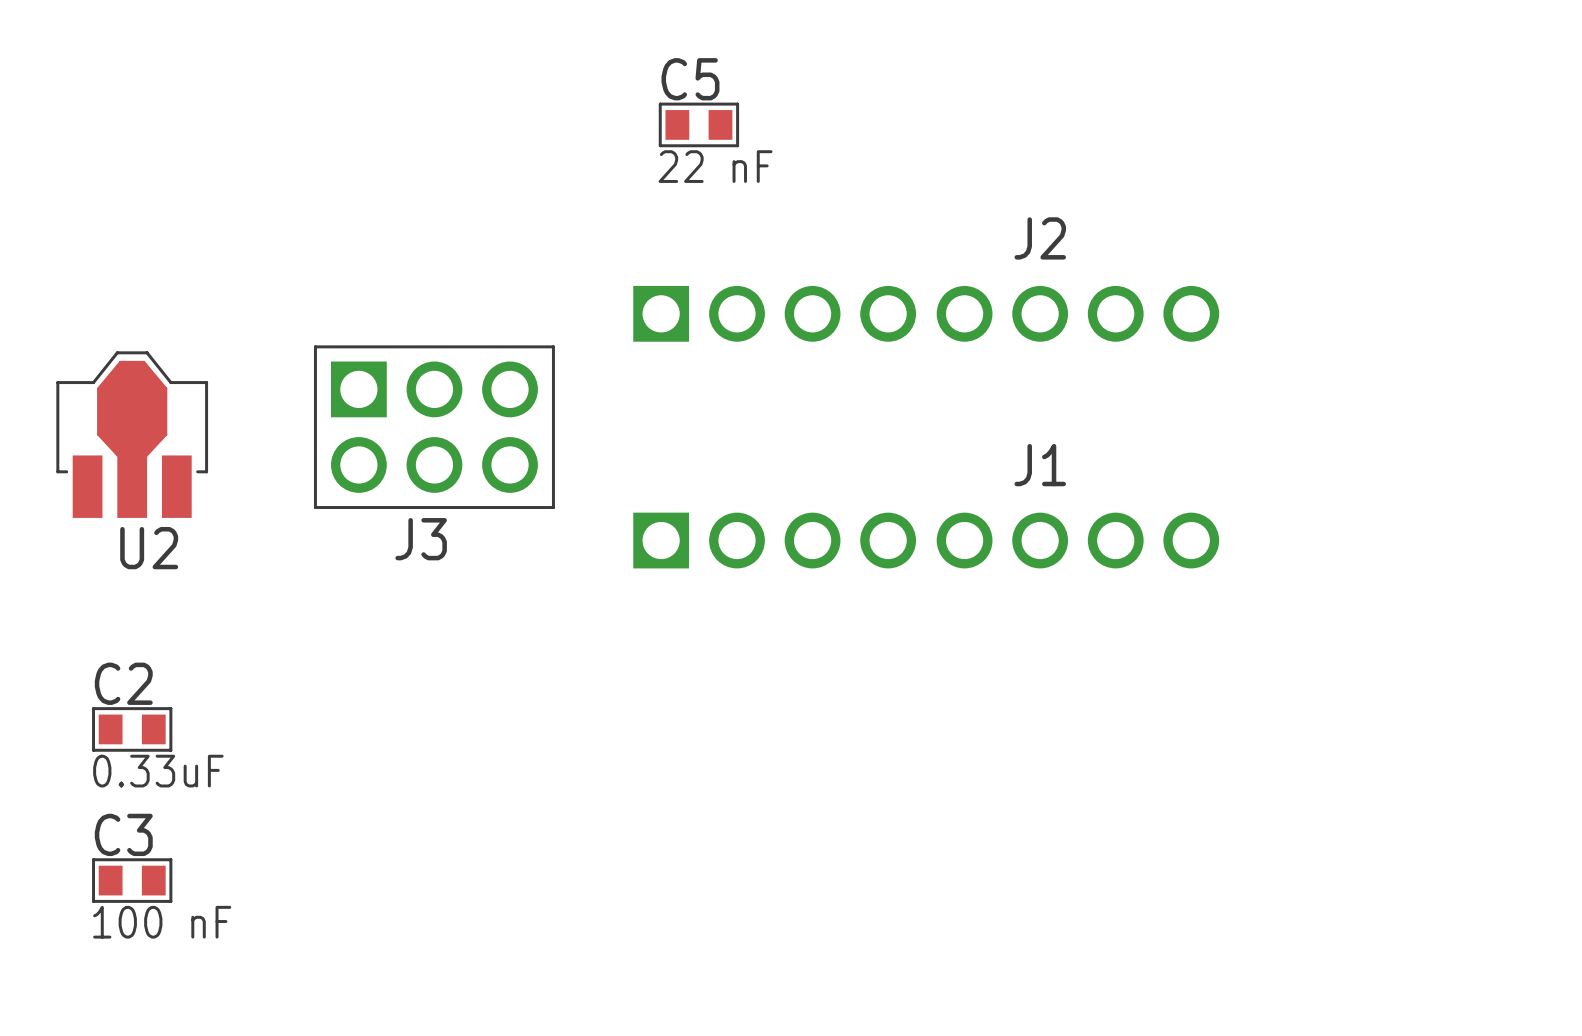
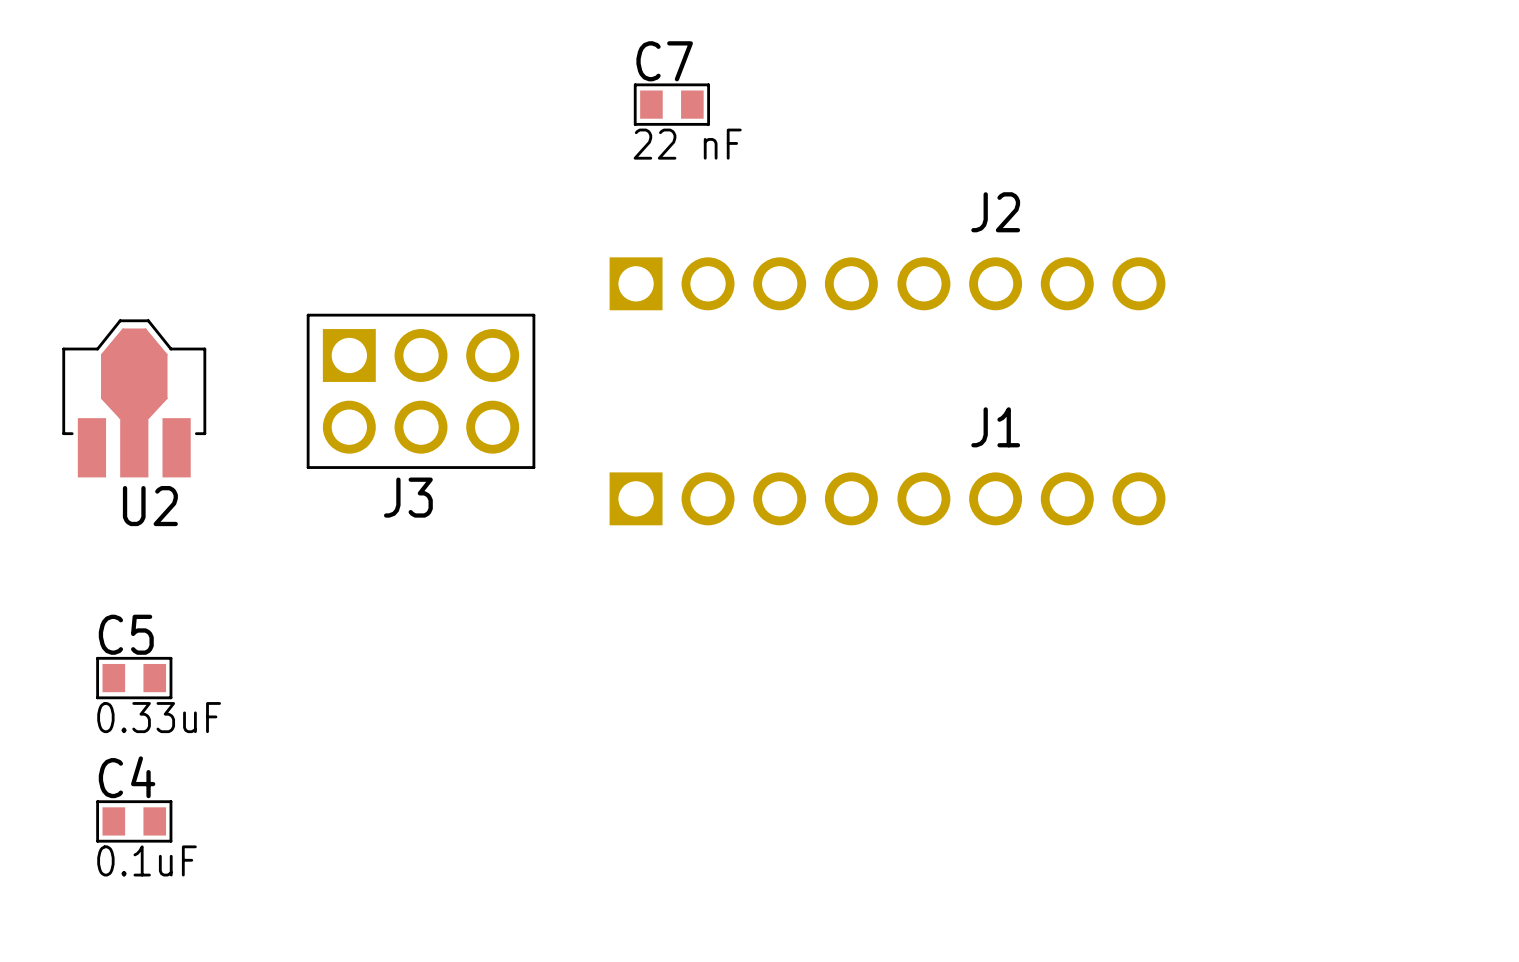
C5 name: C5 (690, 79) -> C7 (664, 61)
C2 name: C2 (123, 683) -> C5 (126, 634)
C3 name: C3 (123, 834) -> C4 (127, 777)
C3 value: 100 nF (162, 922) -> 0.1uF (147, 860)

